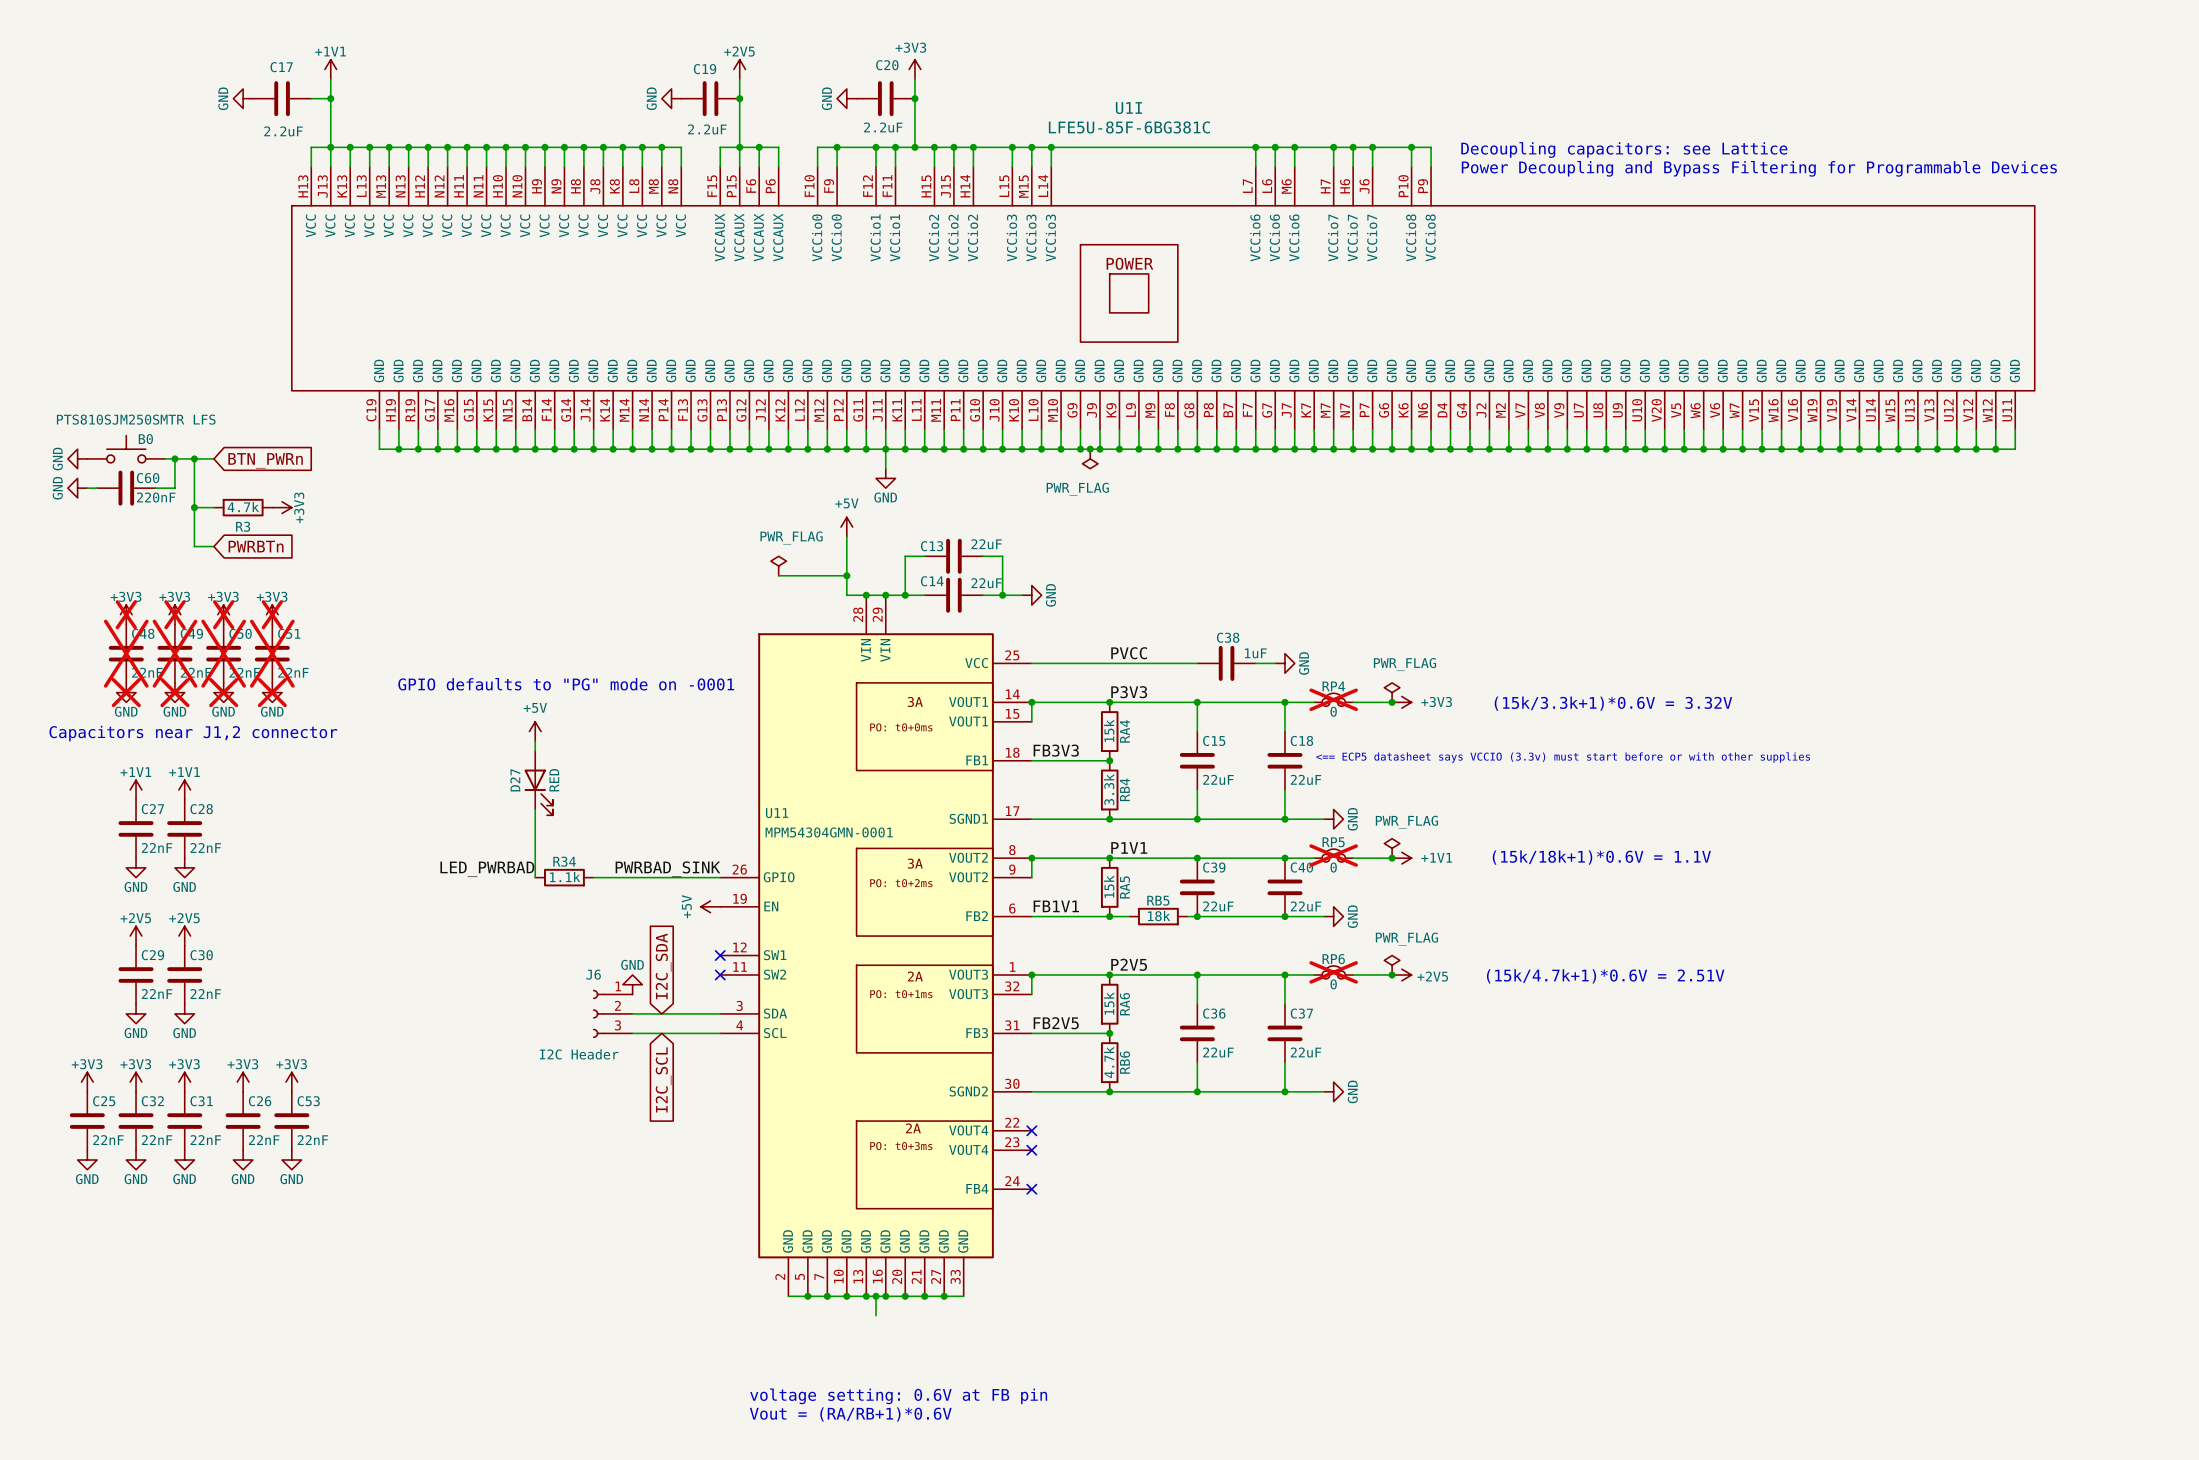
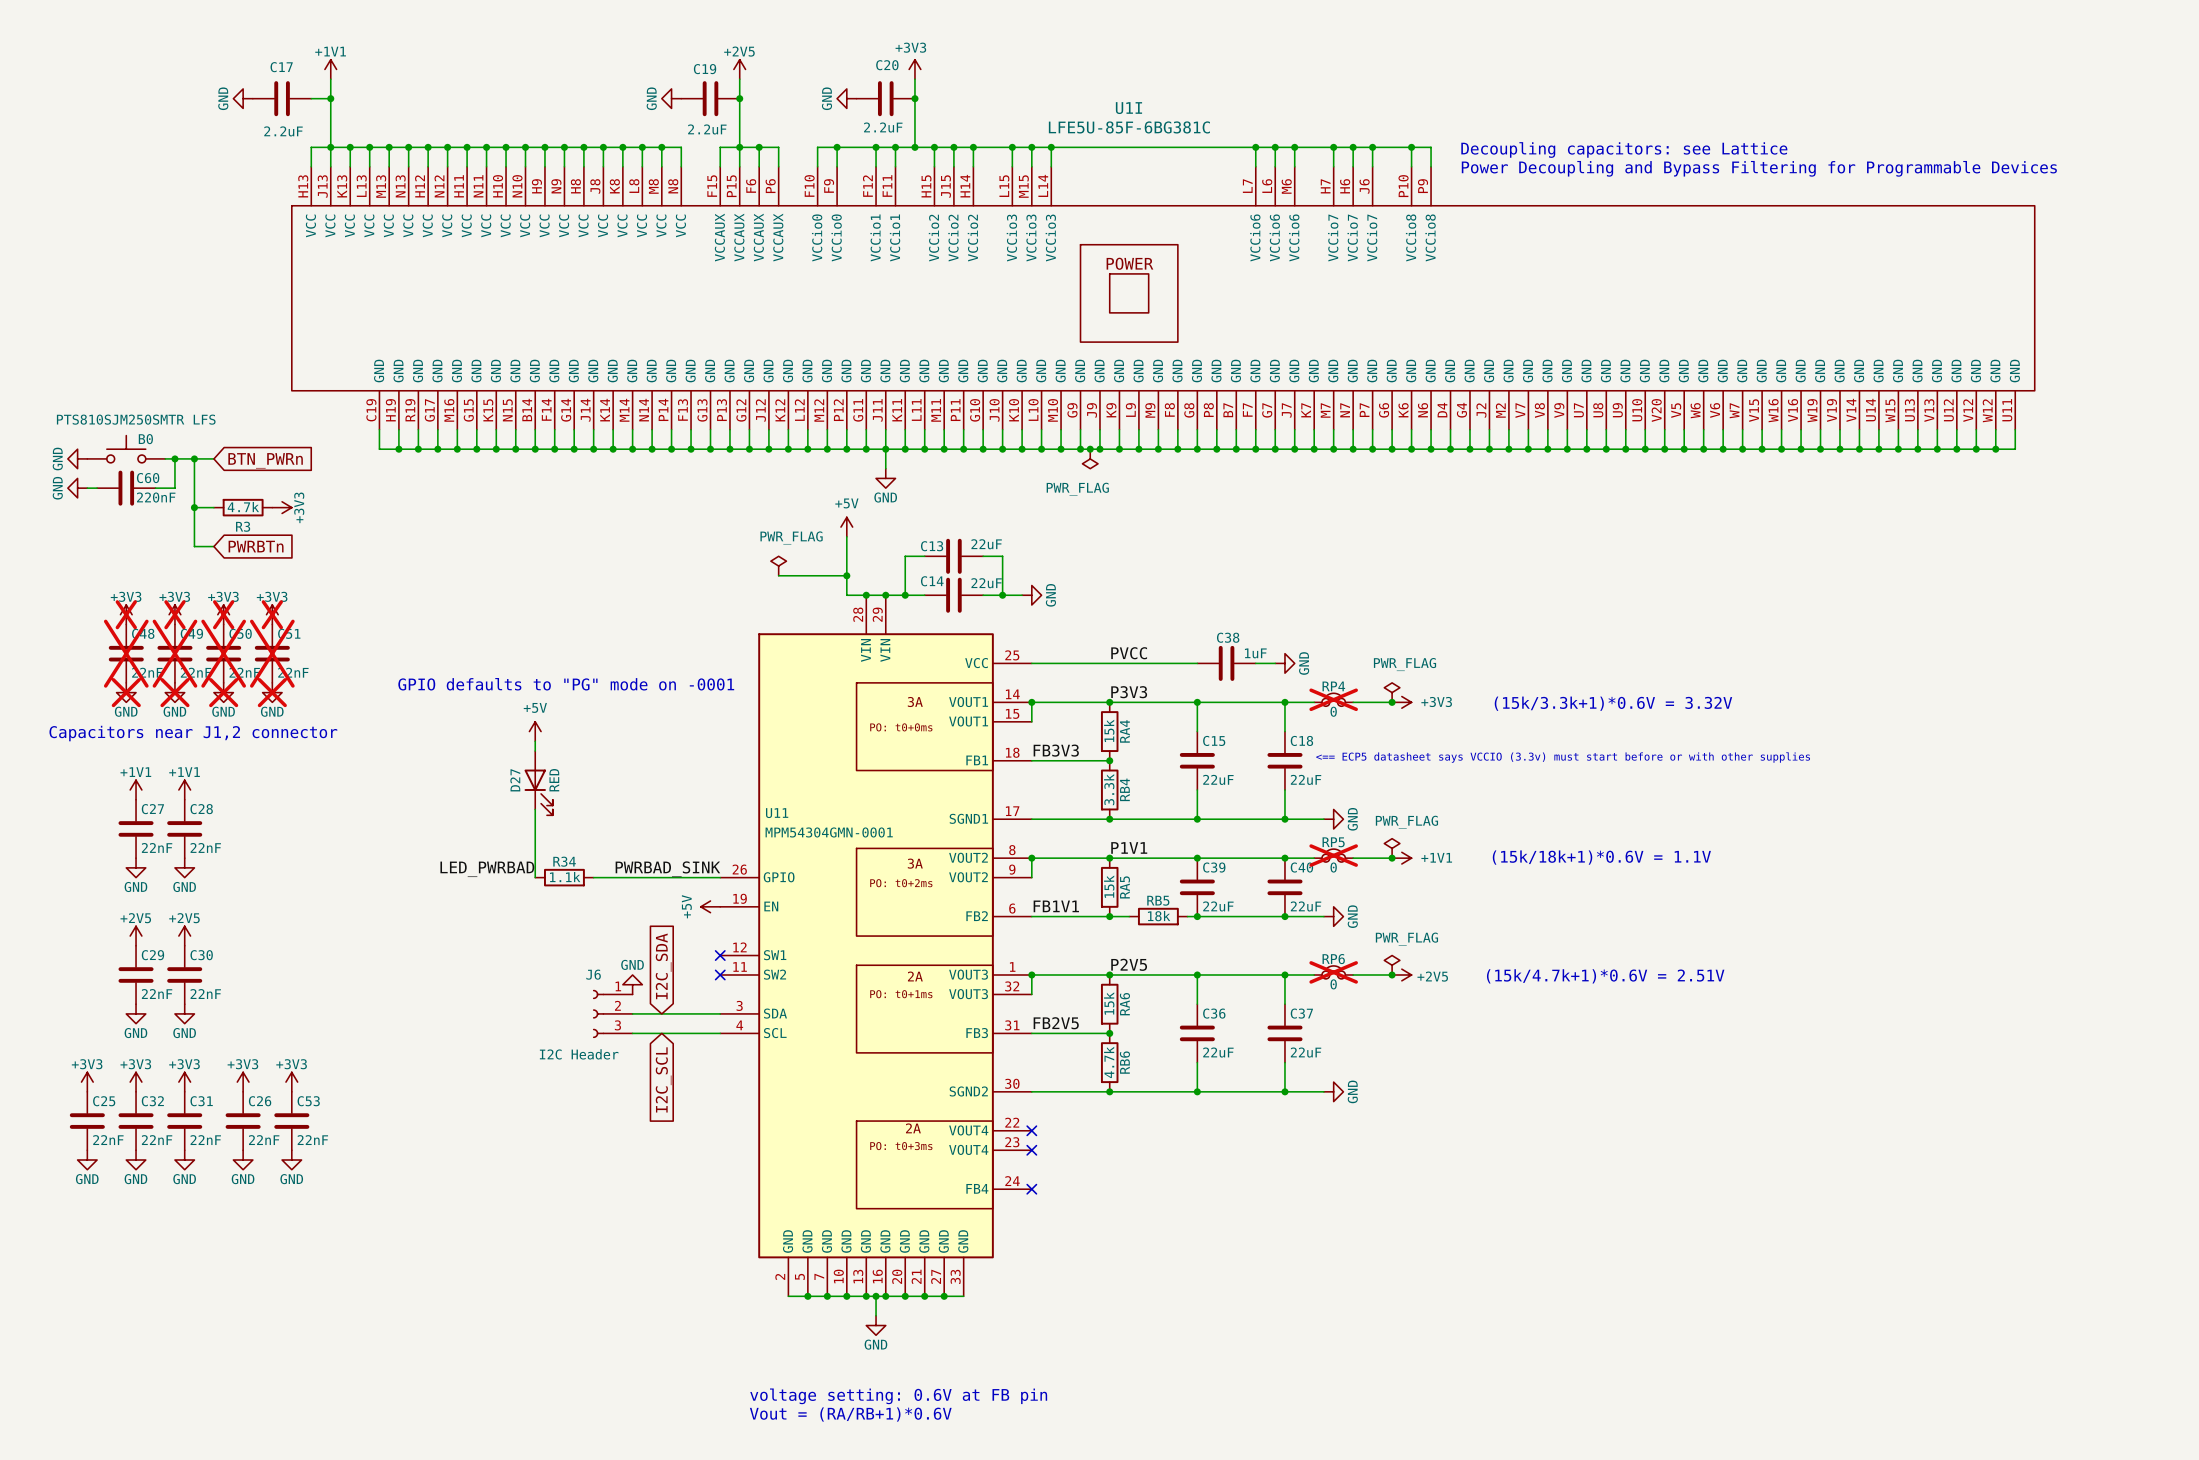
power symbol: none -> GND (876, 1325)

